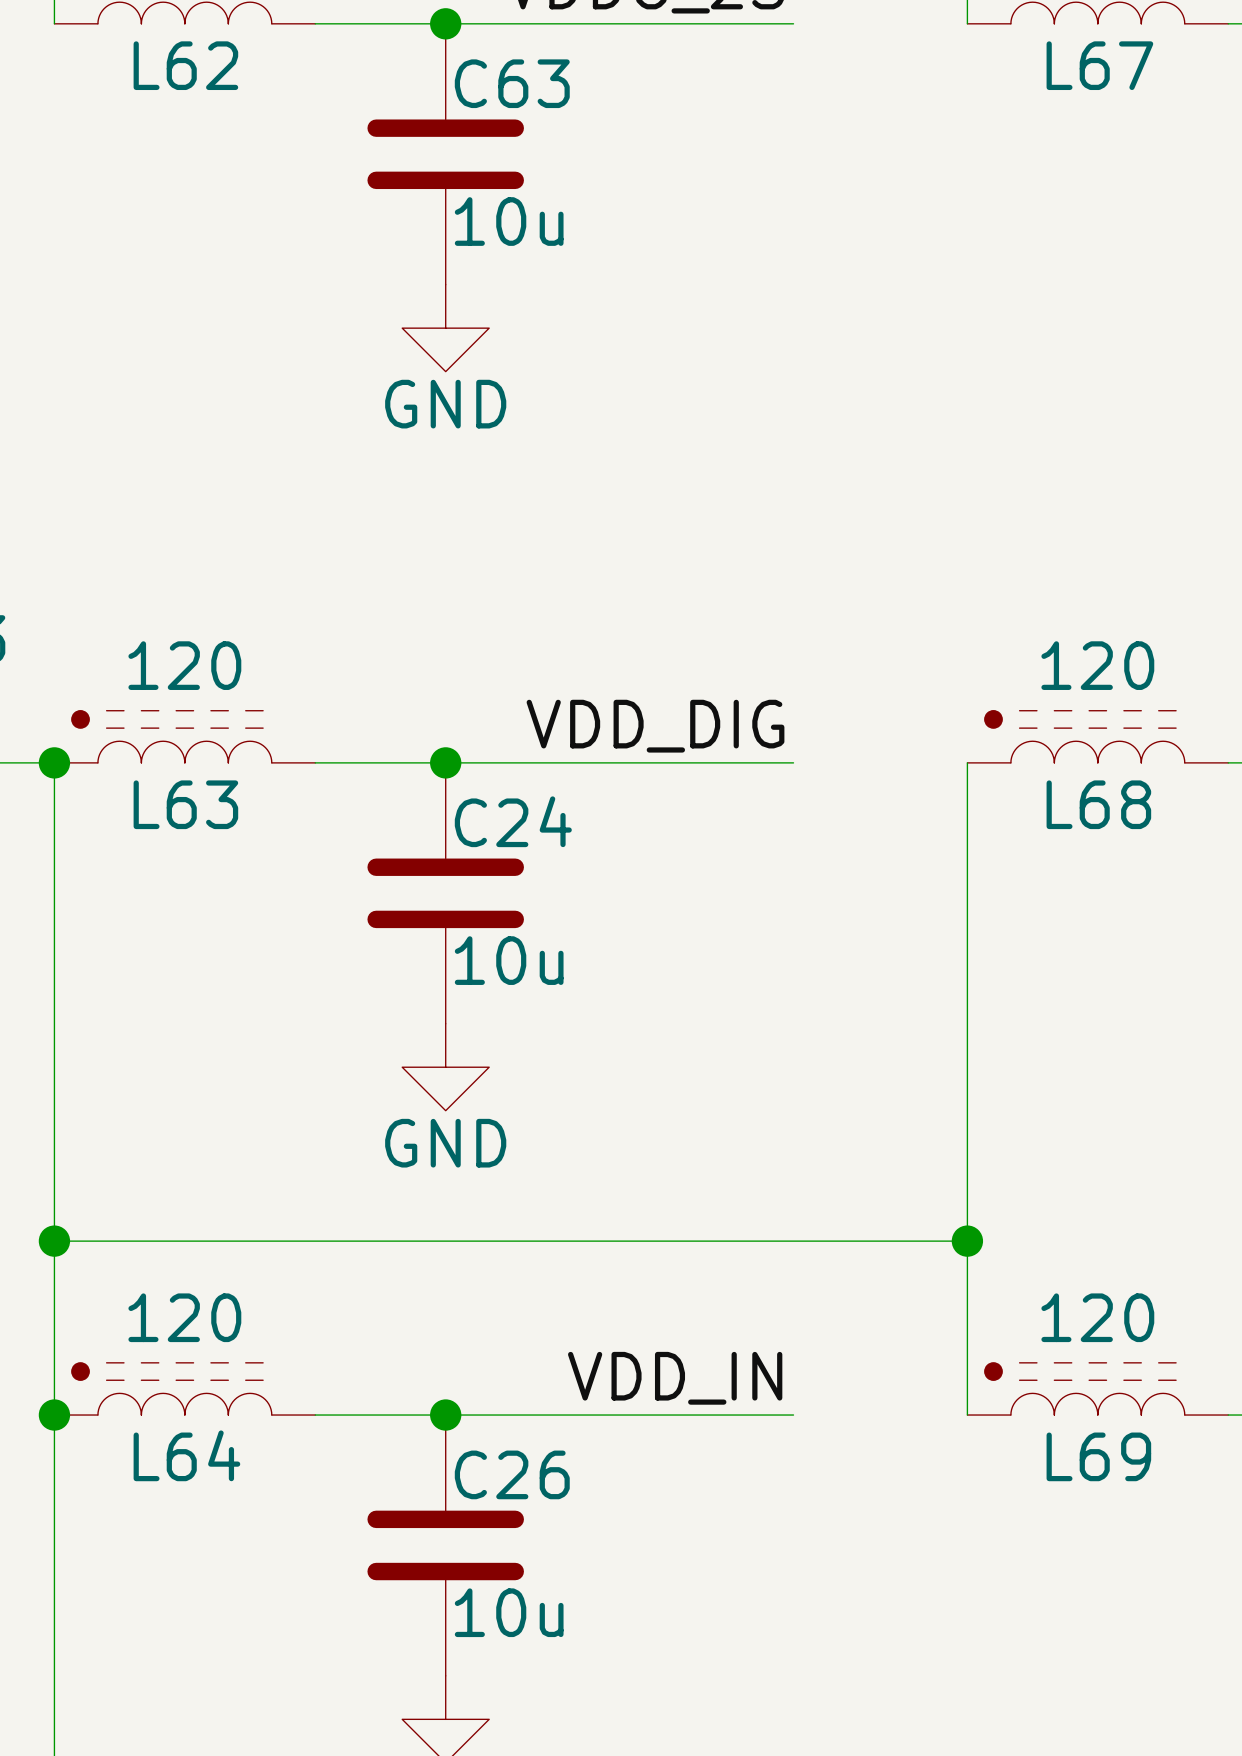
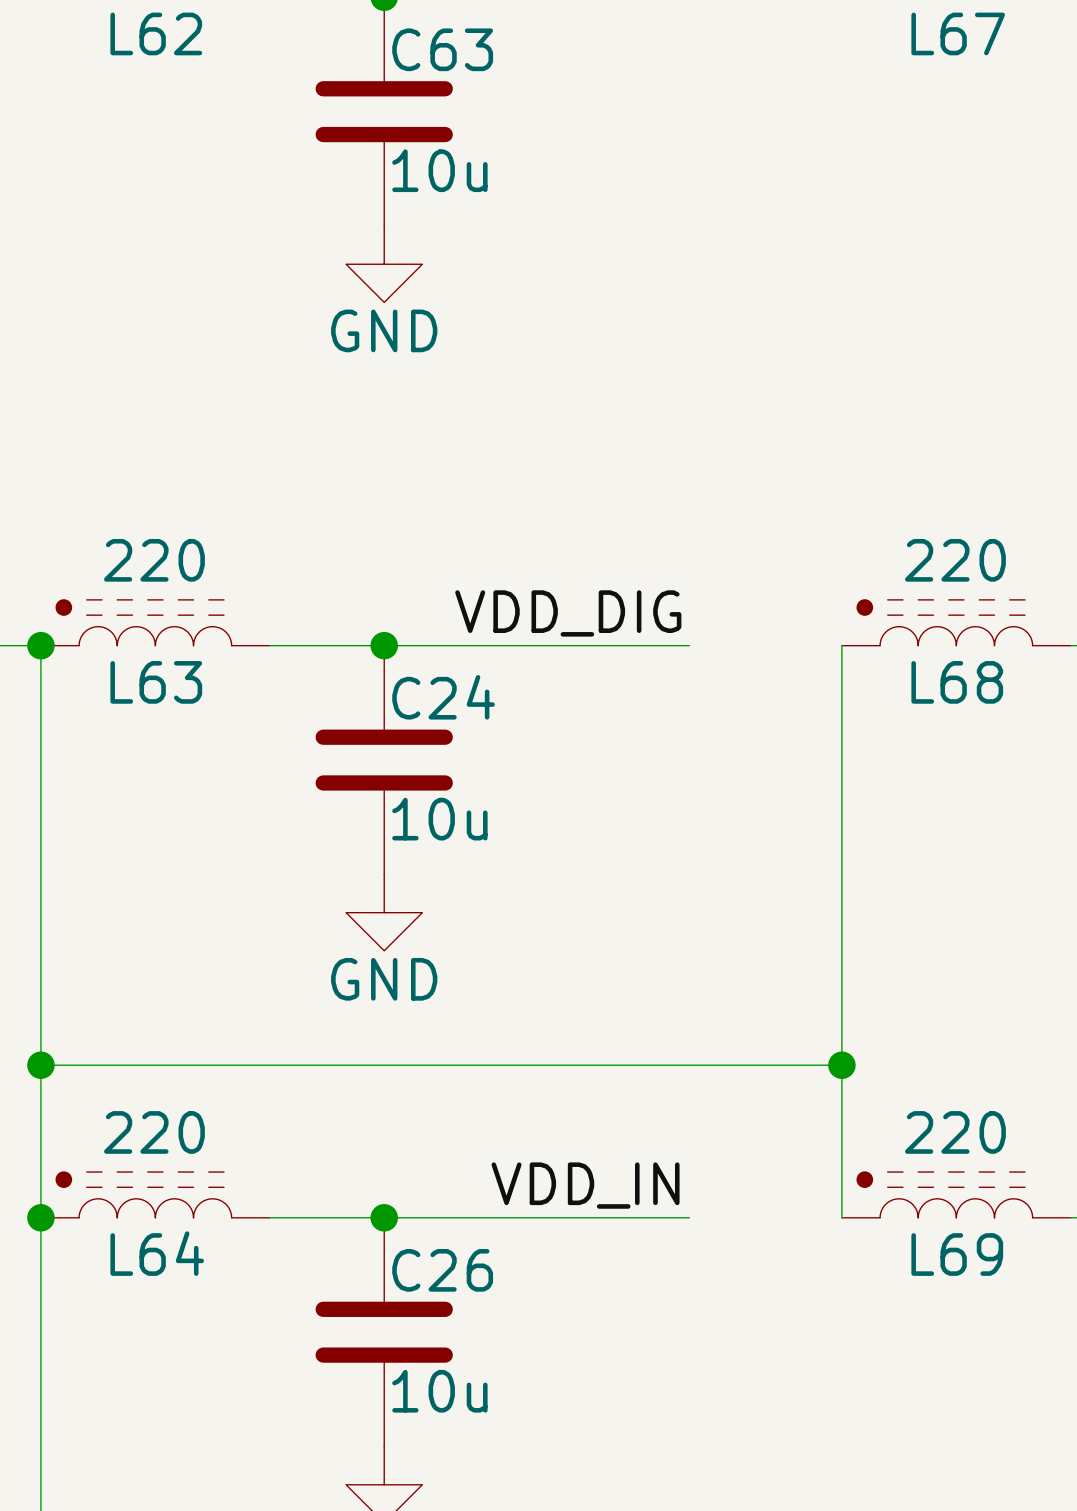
L63 value: 120 (184, 665) -> 220 (154, 560)
L68 value: 120 (1097, 665) -> 220 (955, 560)
L64 value: 120 (184, 1317) -> 220 (154, 1132)
L69 value: 120 (1097, 1317) -> 220 (955, 1132)

